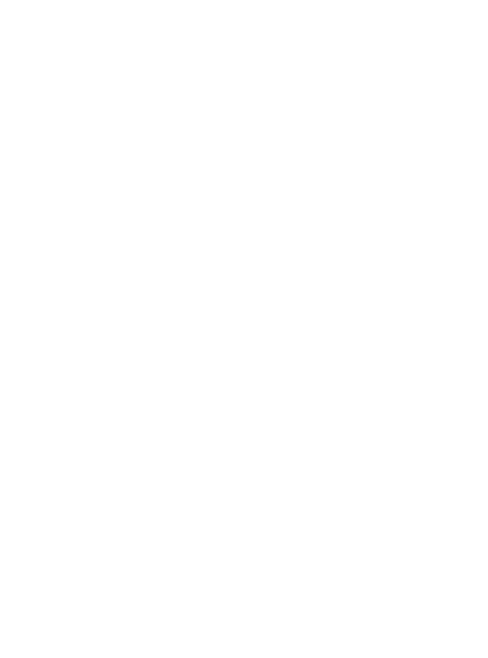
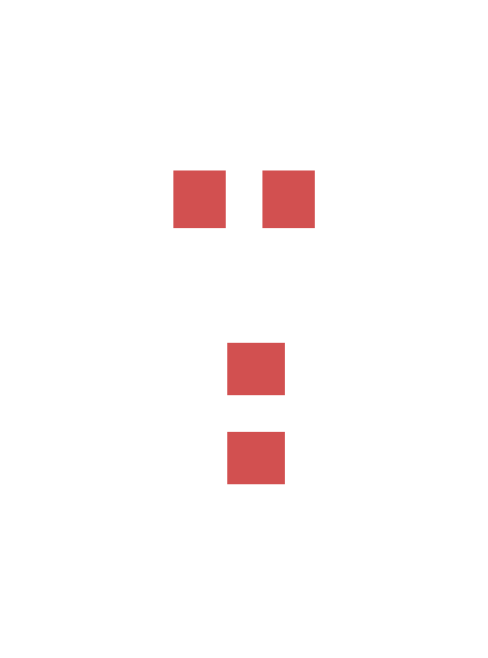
part: none -> (244, 199)
part: none -> (256, 413)

